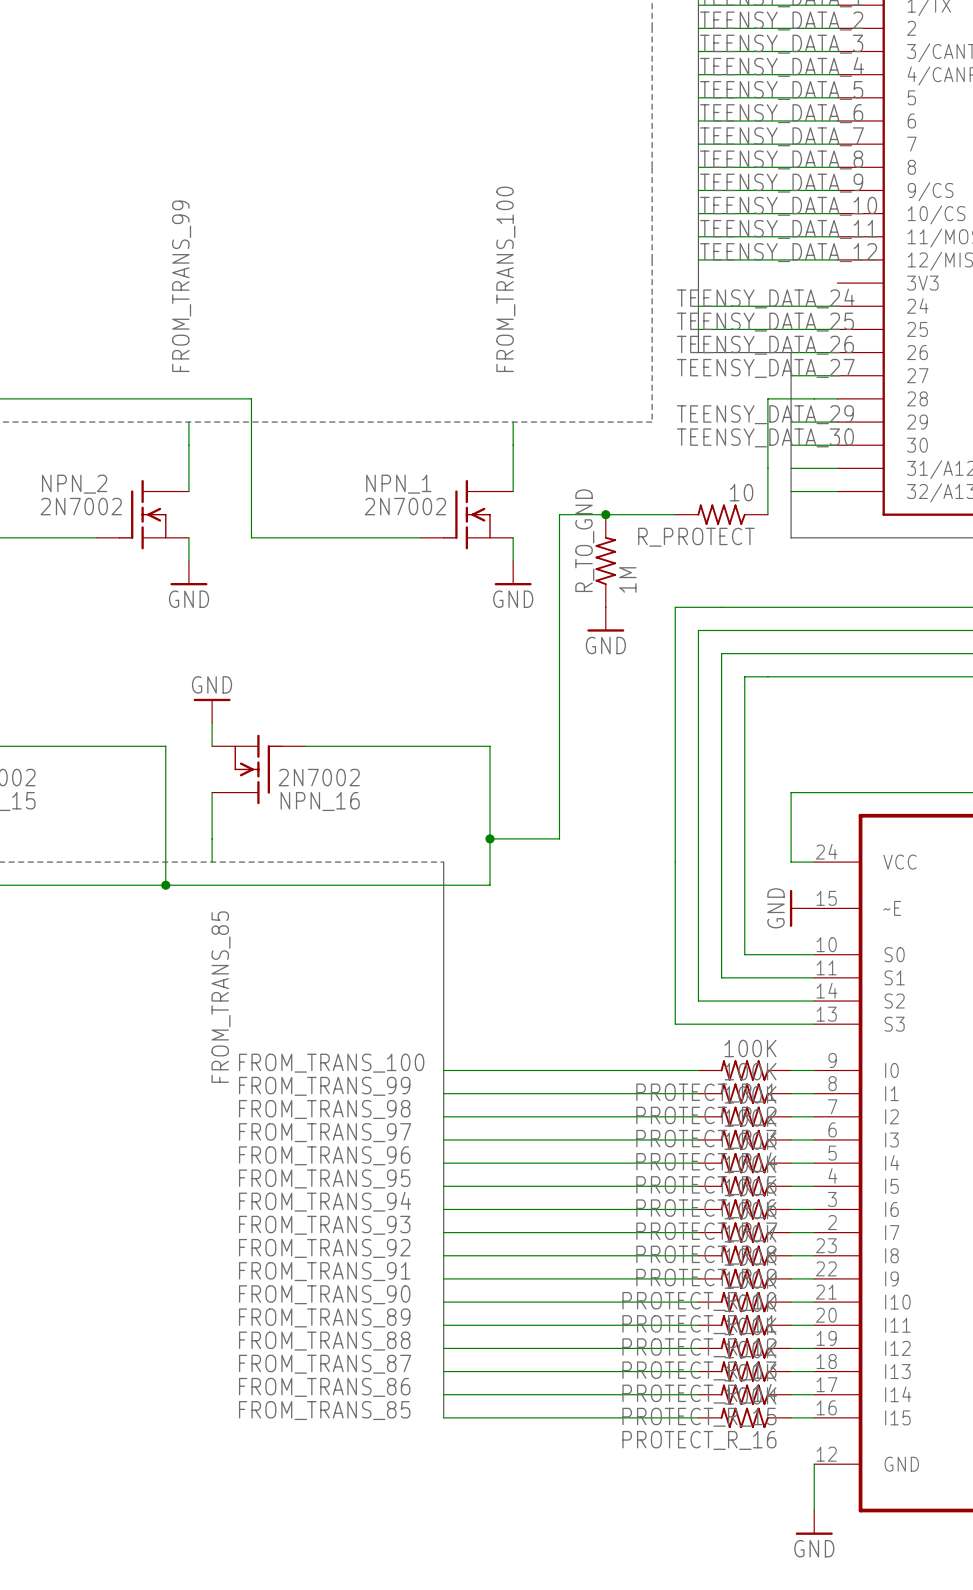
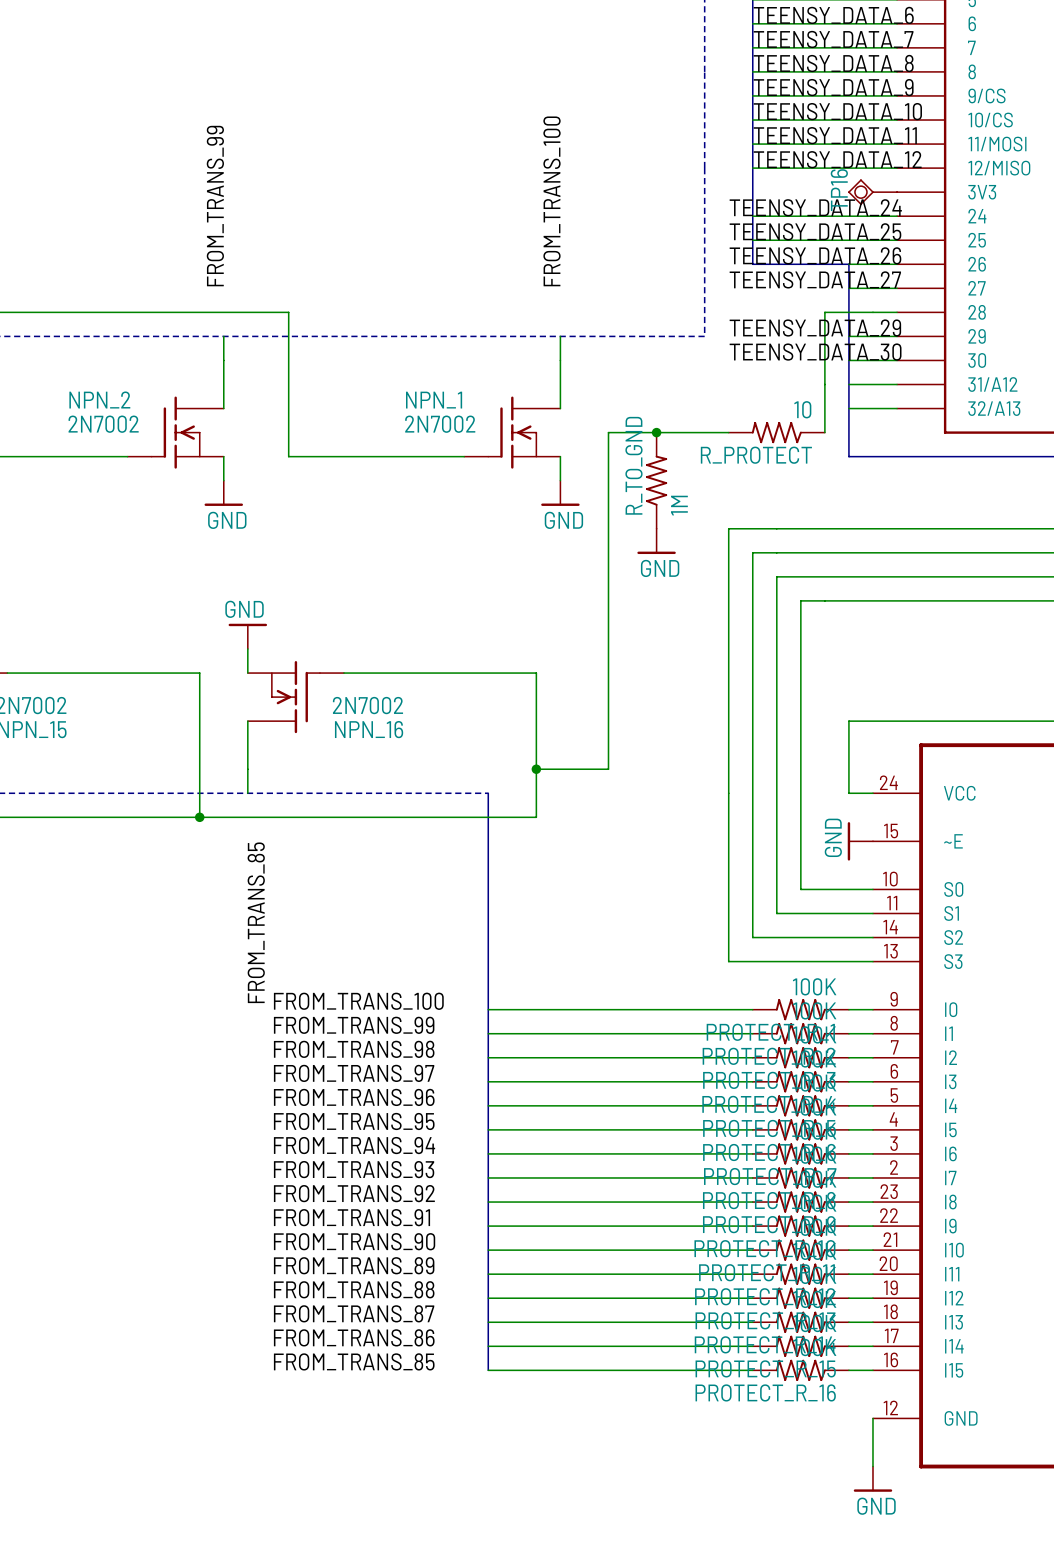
TP16: none -> (872, 192)

